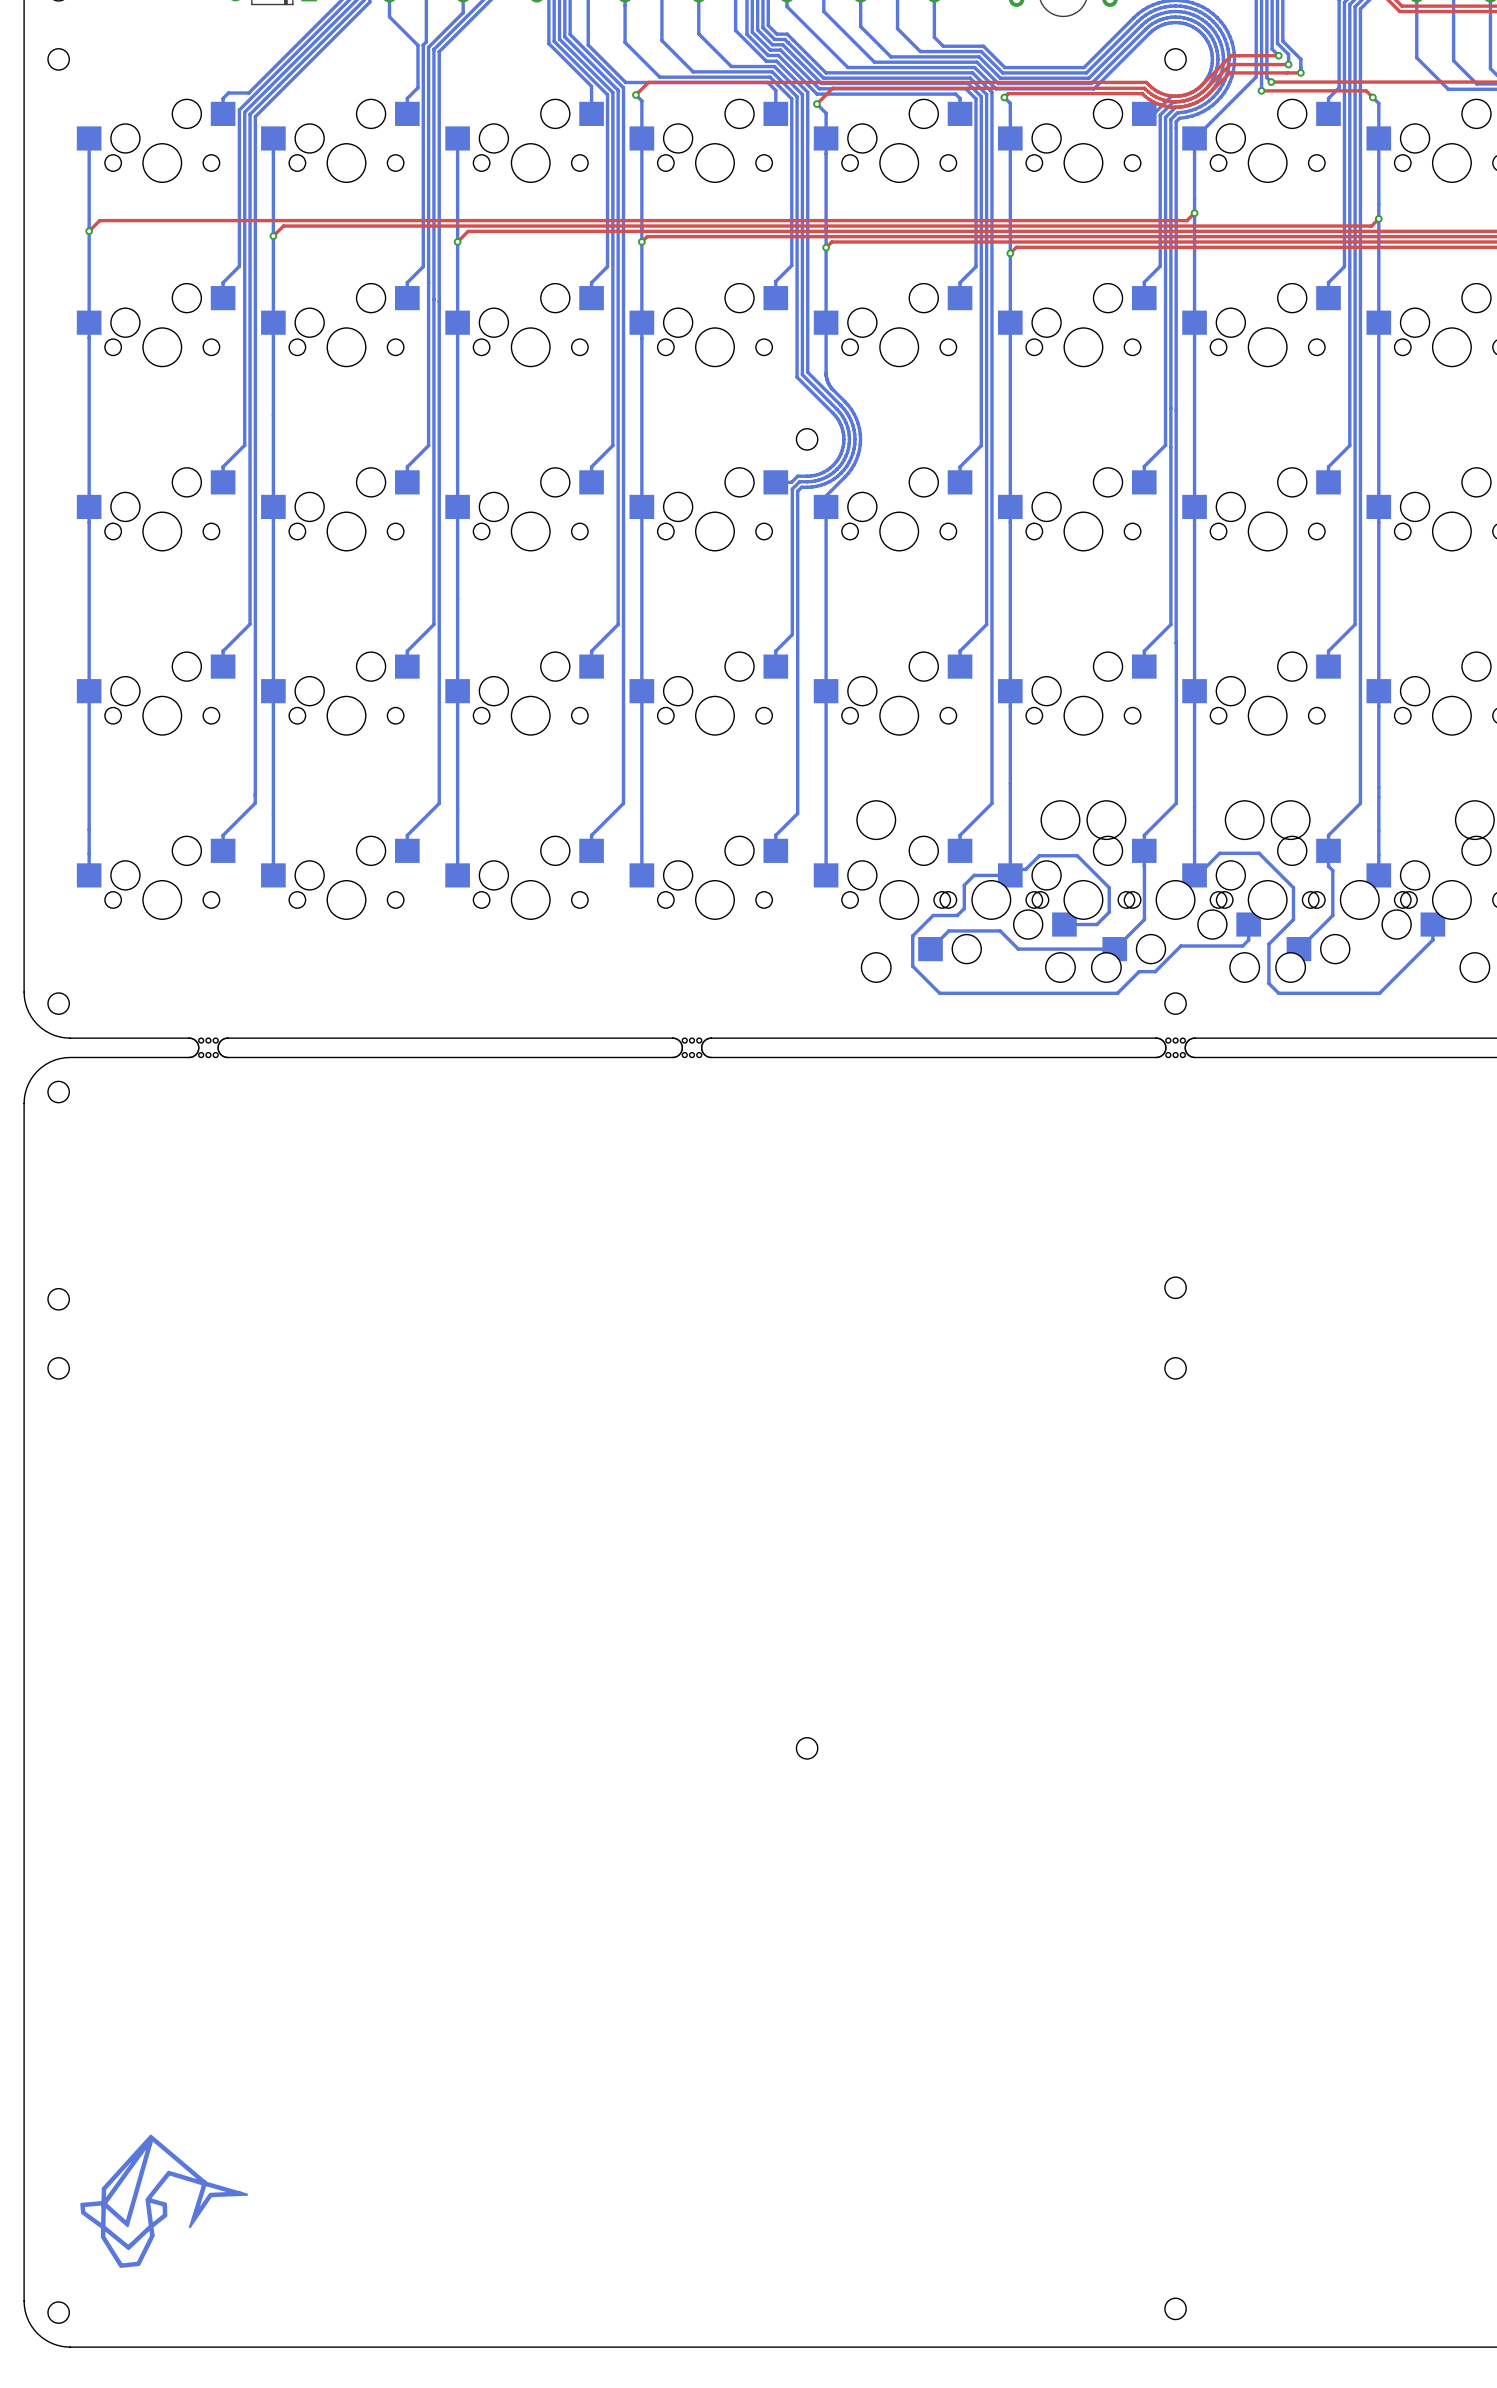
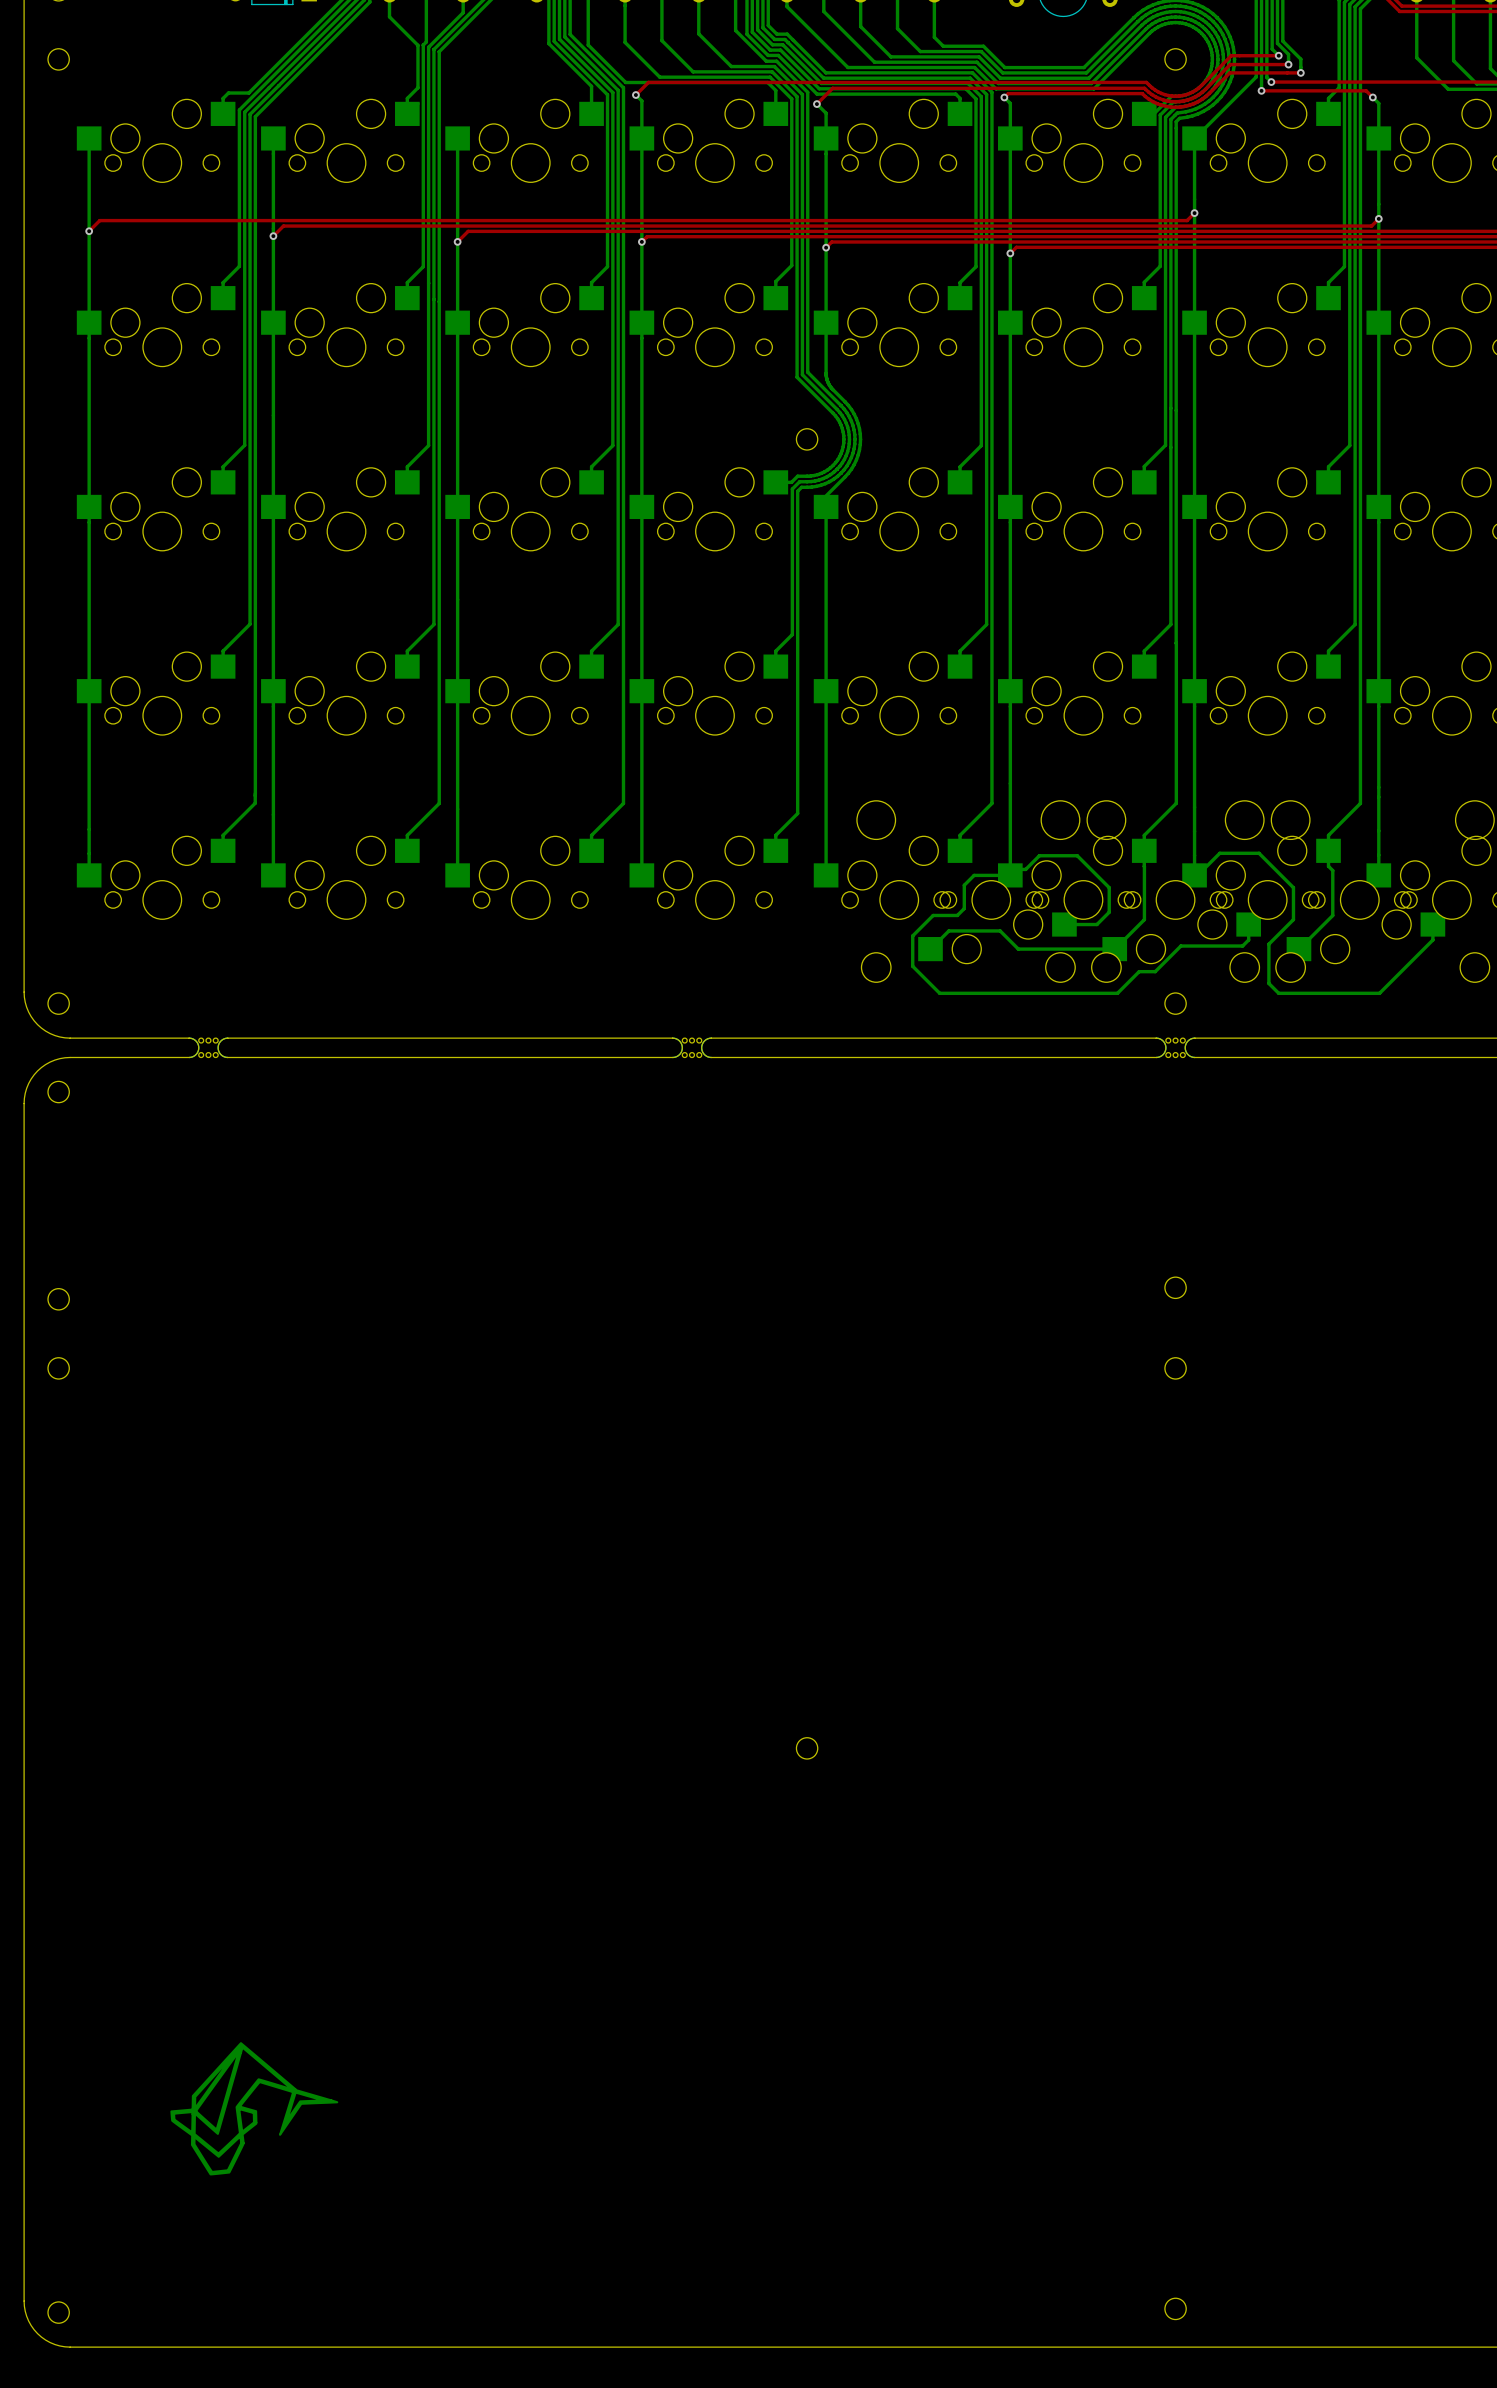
drawing position: (164, 2201) -> (254, 2108)

